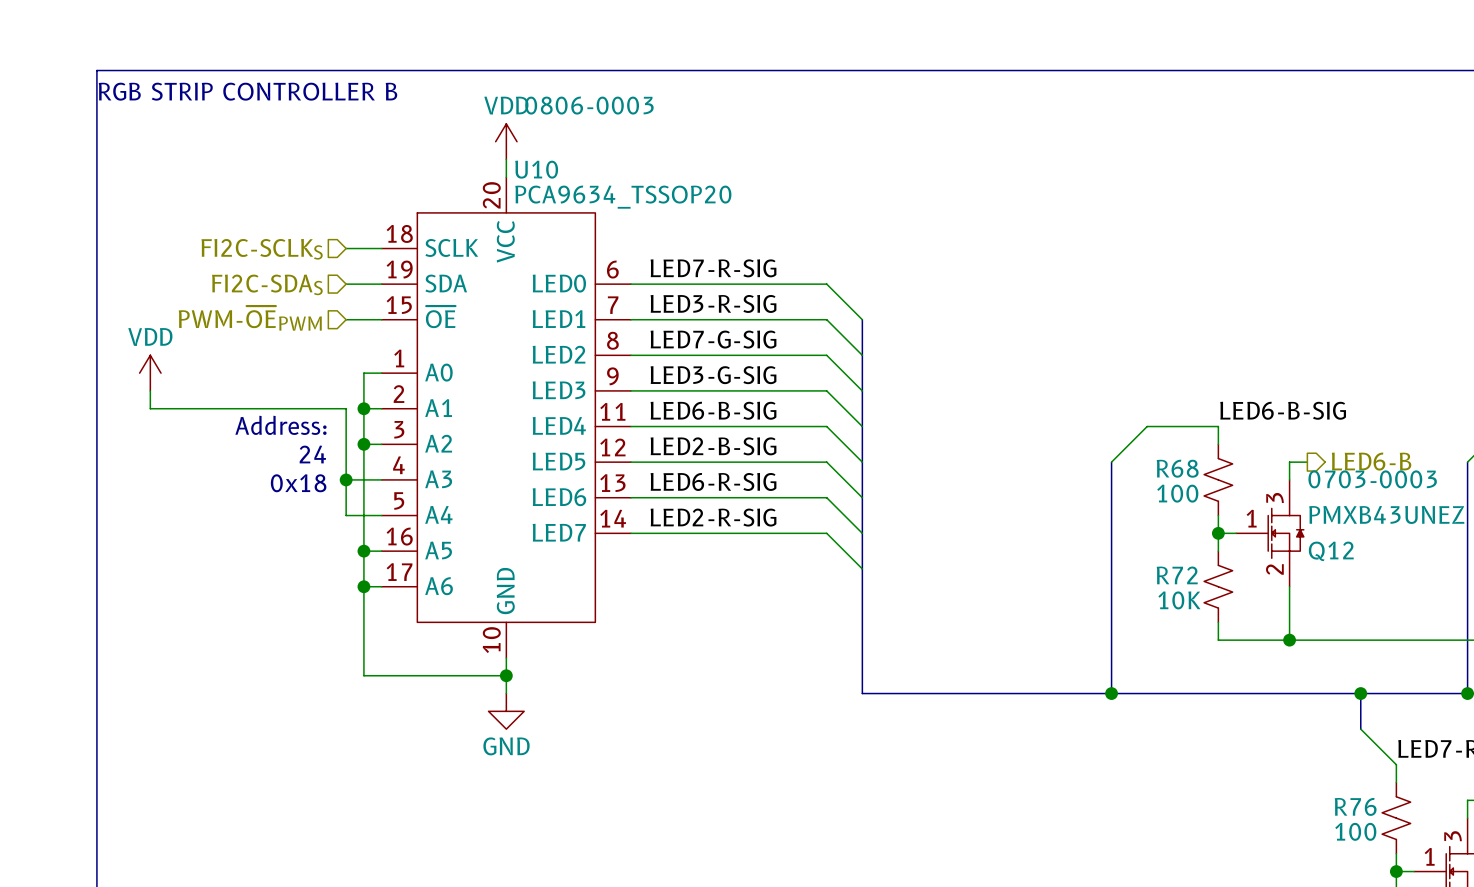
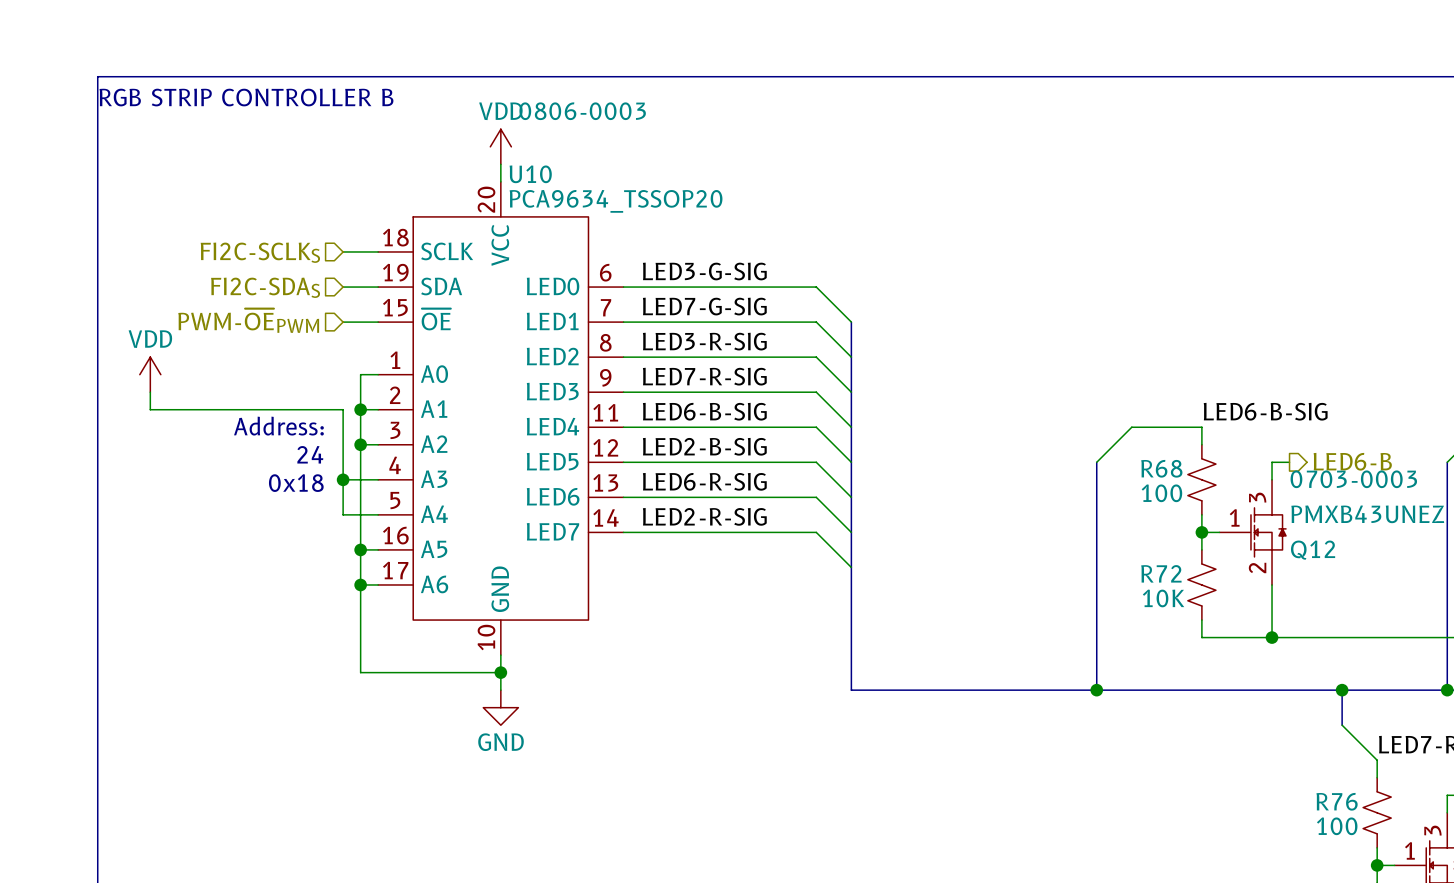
label: LED7-R-SIG (713, 268) -> LED3-G-SIG (704, 271)
label: LED3-R-SIG (713, 303) -> LED7-G-SIG (704, 306)
label: LED7-G-SIG (713, 339) -> LED3-R-SIG (704, 341)
label: LED3-G-SIG (713, 375) -> LED7-R-SIG (704, 376)

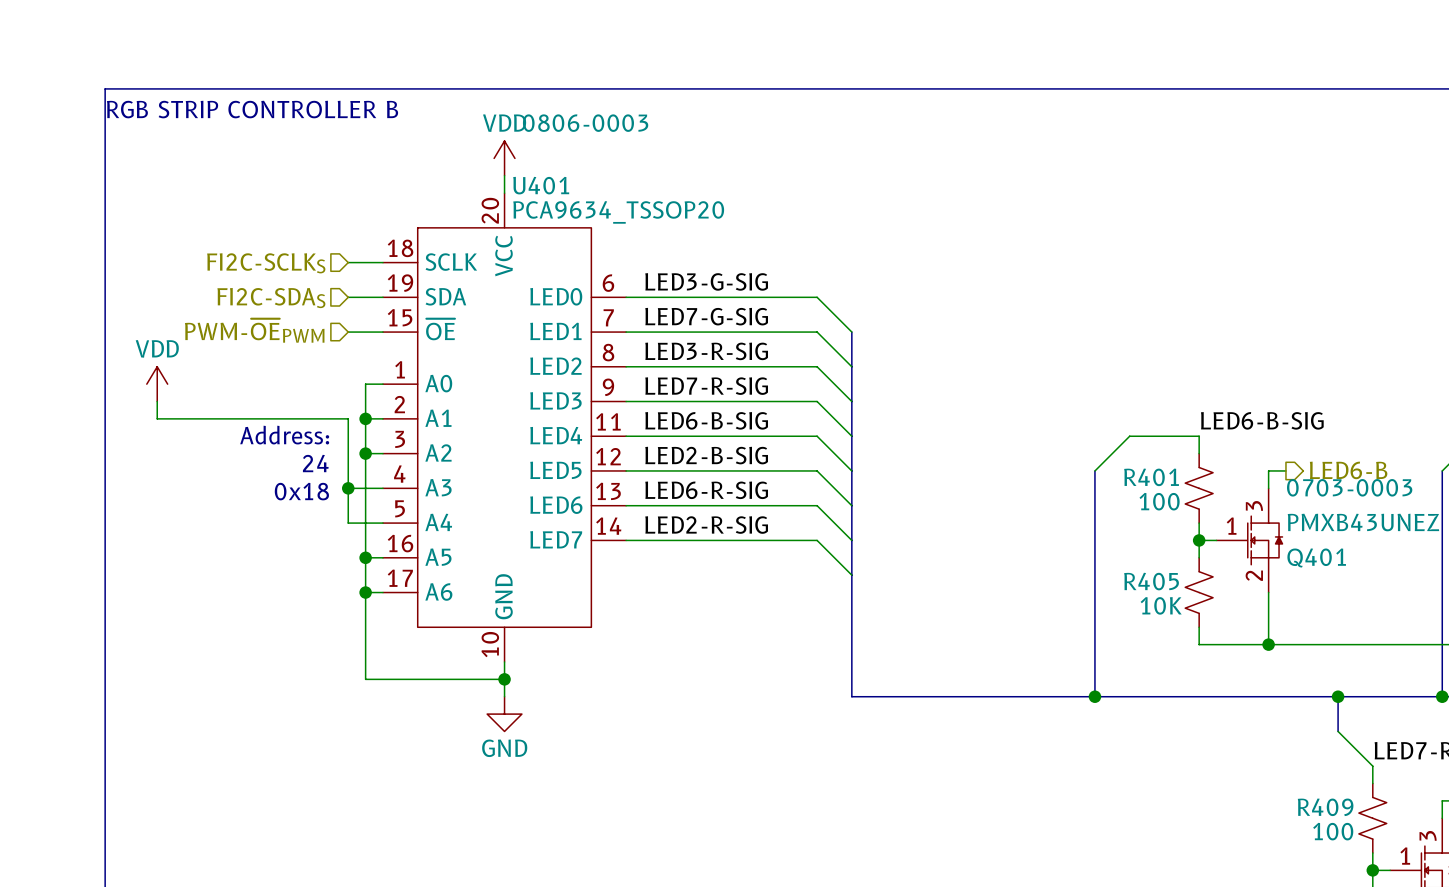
U10 name: U10 (530, 174) -> U401 (541, 185)
R68 name: R68 (1161, 468) -> R401 (1151, 477)
Q12 name: Q12 (1313, 550) -> Q401 (1316, 557)
R72 name: R72 (1161, 573) -> R405 (1151, 581)
R76 name: R76 (1337, 801) -> R409 (1325, 807)

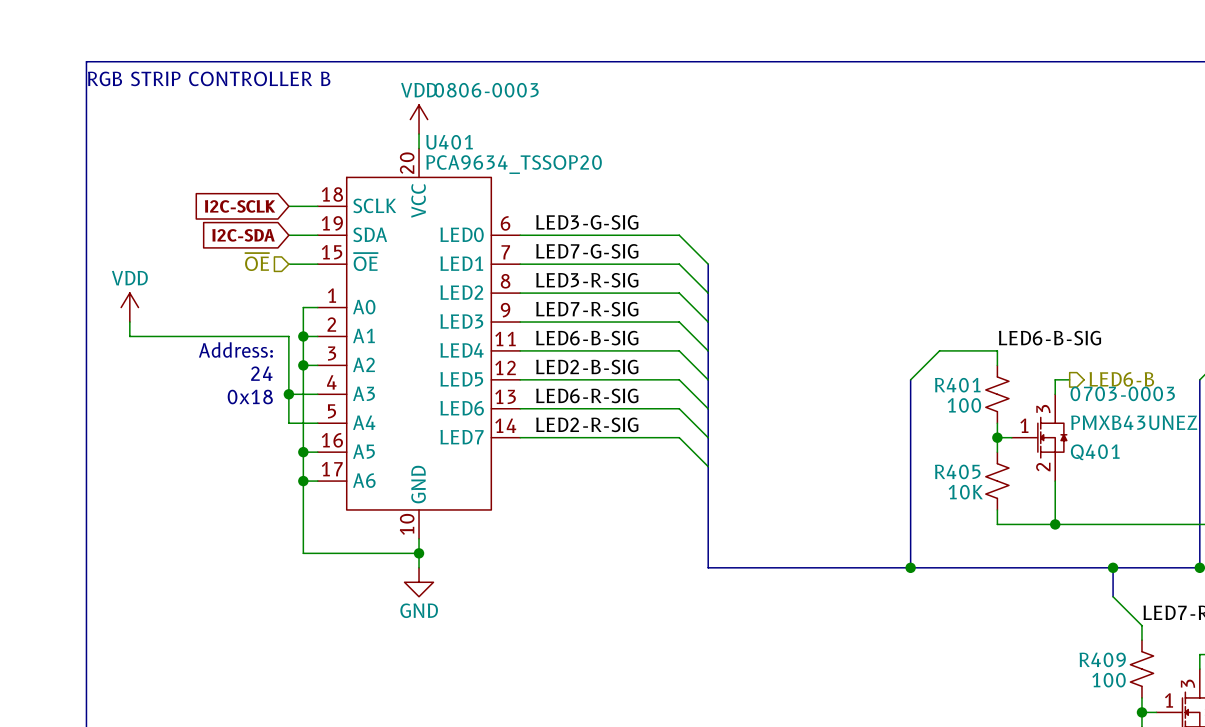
global label: none -> I2C-SCLK (240, 206)
hierarchical label: FI2C-SCLKS (266, 263) -> none
global label: none -> I2C-SDA (243, 235)
hierarchical label: FI2C-SDAS (271, 298) -> none
hierarchical label: PWM-~{OE}PWM (254, 330) -> ~{OE} (257, 262)

